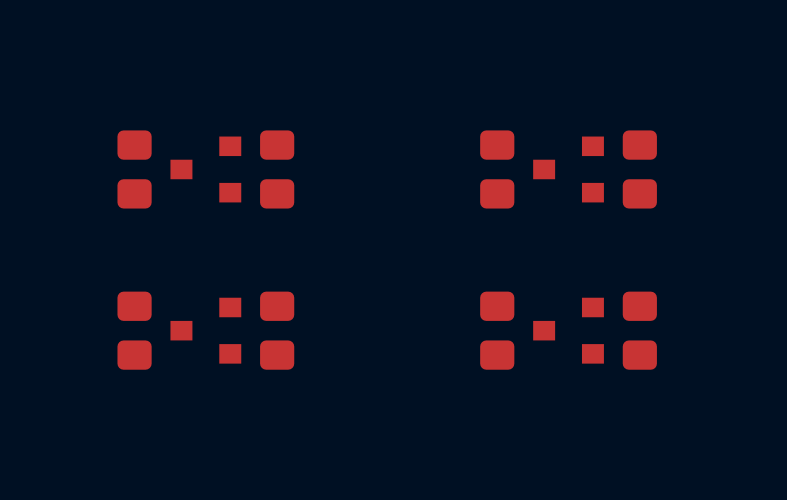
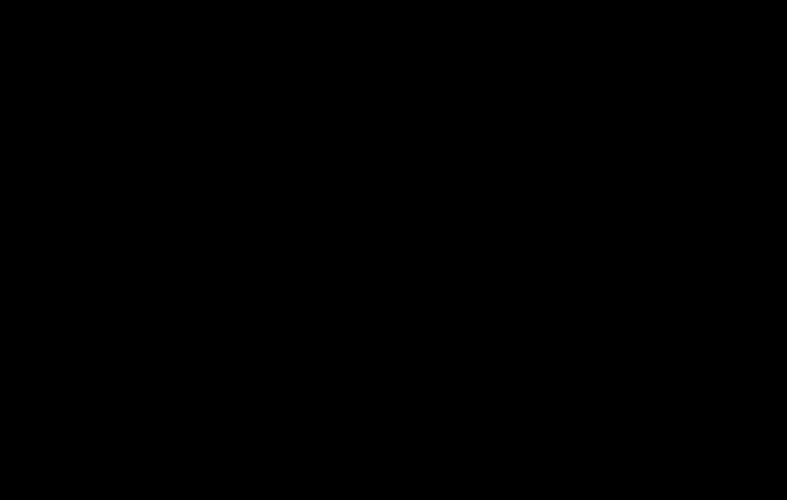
part: (134, 169) -> none
part: (205, 169) -> none
part: (277, 169) -> none
part: (497, 169) -> none
part: (568, 169) -> none
part: (639, 169) -> none
part: (134, 330) -> none
part: (205, 330) -> none
part: (277, 330) -> none
part: (497, 330) -> none
part: (568, 330) -> none
part: (639, 330) -> none

